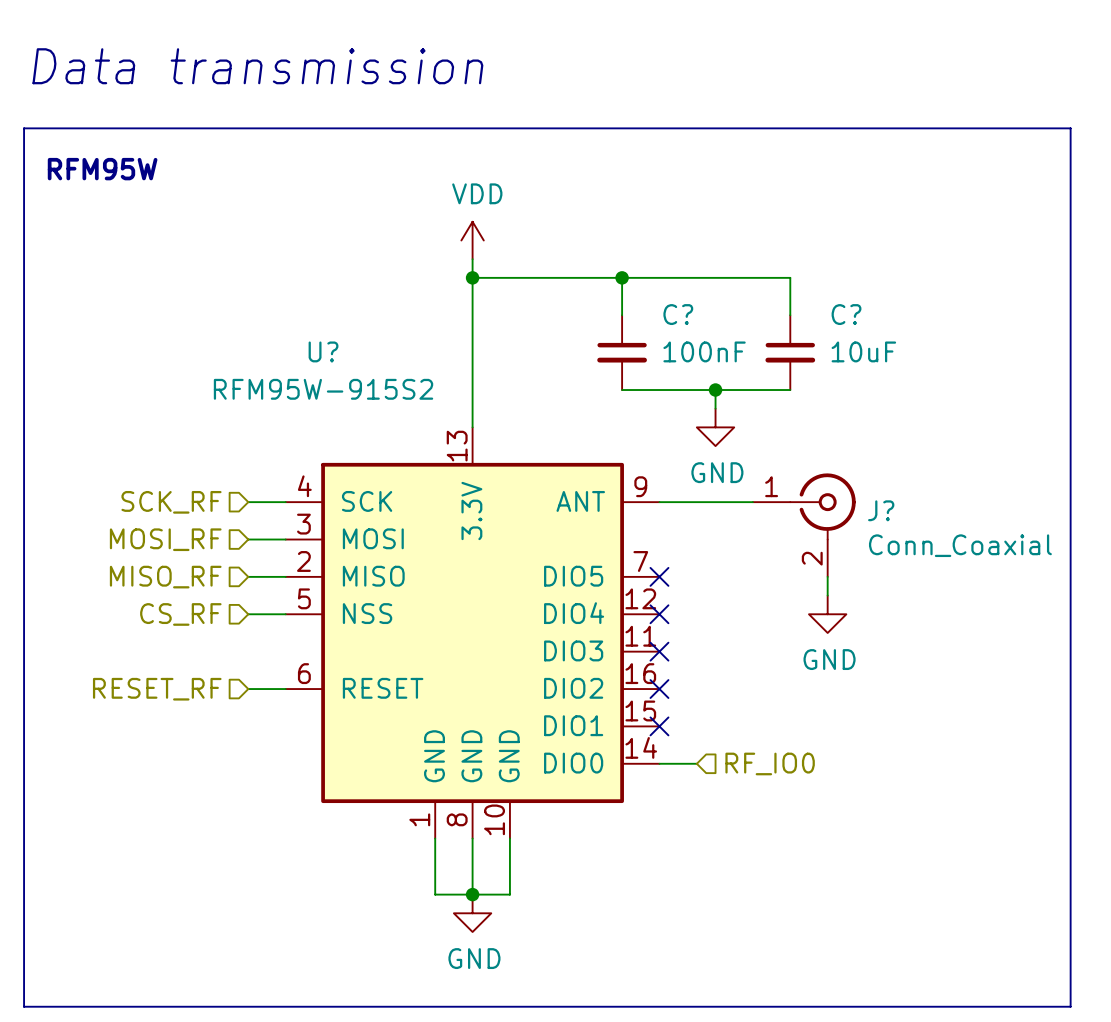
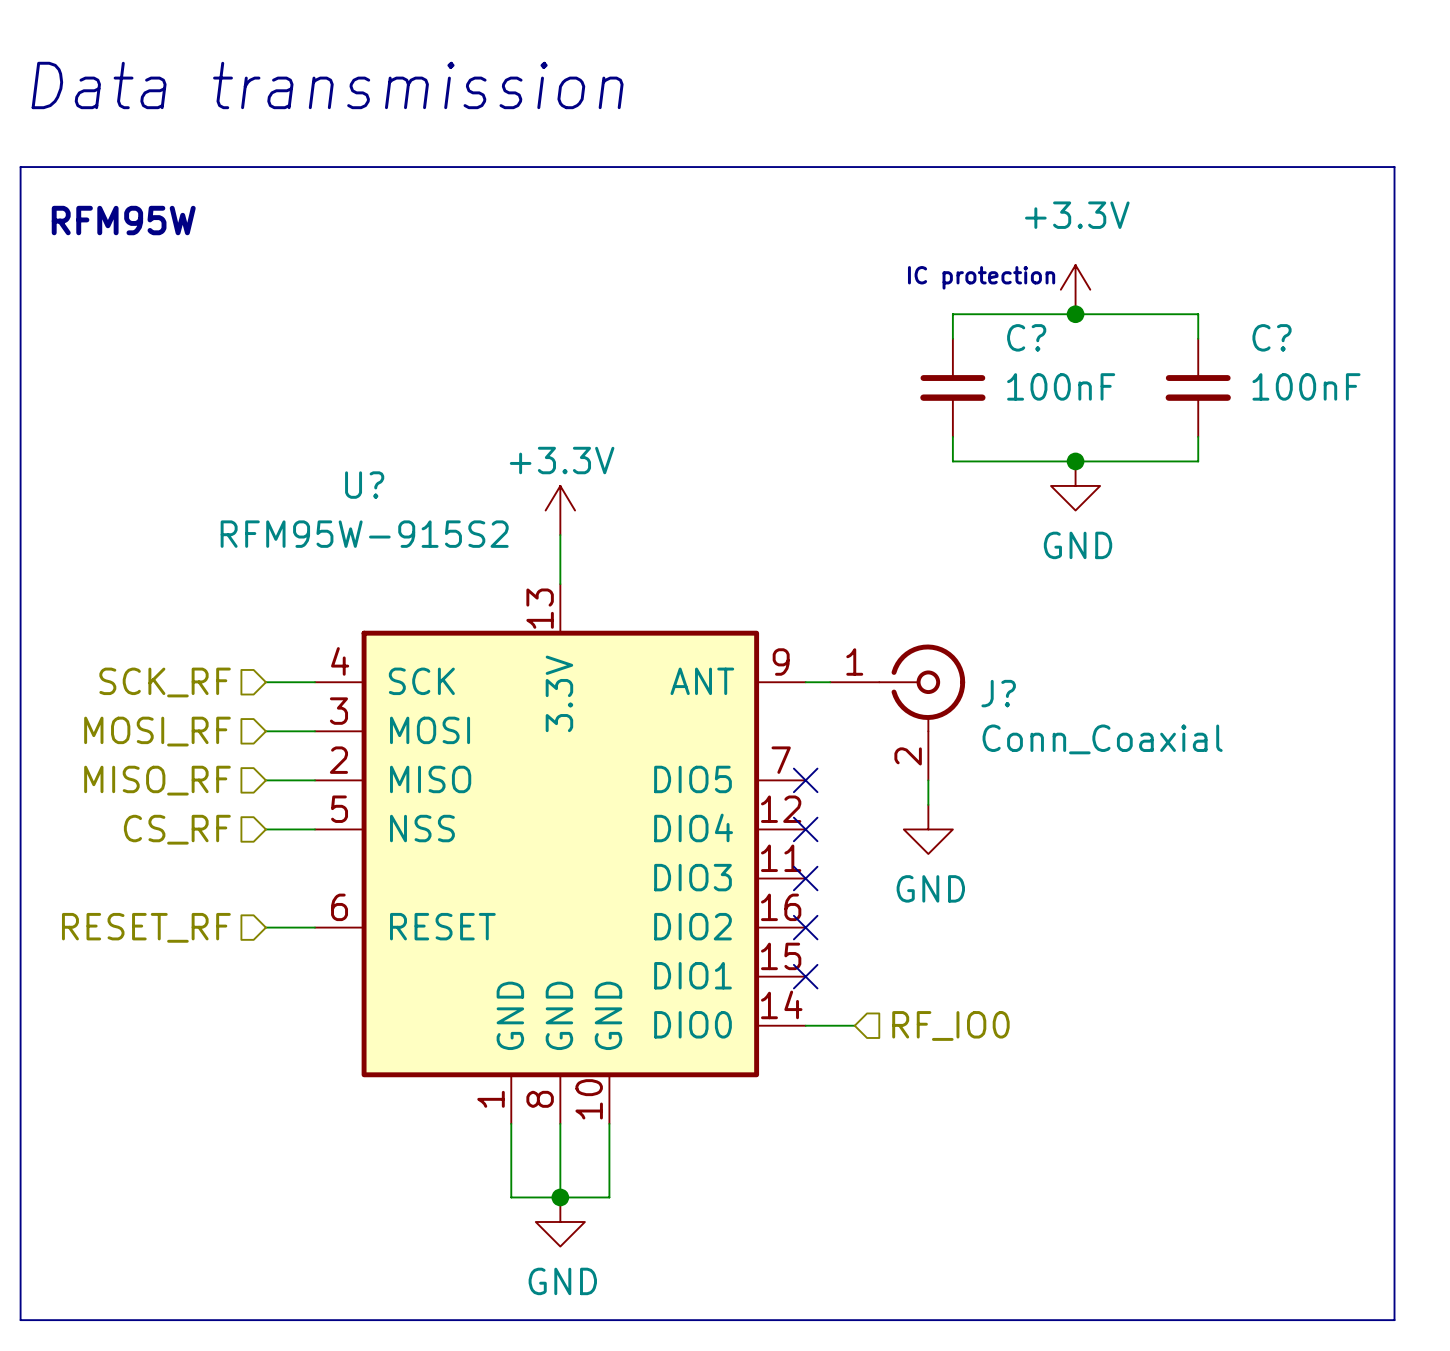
text: none -> IC protection (981, 277)
power symbol: none -> +3.3V (1075, 289)
power symbol: VDD (472, 240) -> none
junction: none -> (1075, 314)
wire: (472, 259) (472, 427) -> none
wire: none -> (952, 338) (952, 314) (1198, 314) (1198, 338)
wire: (472, 277) (790, 277) (790, 315) -> none
junction: (472, 277) -> none
wire: (622, 277) (622, 315) -> (560, 535) (560, 584)
junction: (622, 277) -> none
C?: none -> 100nF (1198, 387)
wire: none -> (952, 436) (952, 461) (1198, 461) (1198, 436)
C? position: (622, 352) -> (952, 387)
C?: 10uF (790, 352) -> none
junction: none -> (1075, 461)
power symbol: none -> GND (1075, 485)
power symbol: none -> +3.3V (560, 510)
wire: (622, 390) (790, 390) -> none
wire: (715, 390) (715, 408) -> none
junction: (715, 390) -> none
power symbol: GND (715, 427) -> none
hierarchical label position: SCK_RF (171, 502) -> SCK_RF (165, 682)
wire: (248, 502) (285, 502) -> (265, 682) (315, 682)
wire: (659, 502) (752, 502) -> none
wire: none -> (805, 682) (830, 682)
J? position: (804, 525) -> (897, 712)
hierarchical label position: MOSI_RF (165, 539) -> MOSI_RF (157, 731)
wire: (248, 539) (285, 539) -> (265, 731) (315, 731)
wire: (248, 576) (285, 576) -> (265, 780) (315, 780)
no-connect mark: (659, 576) -> none
wire: (827, 576) (827, 595) -> (928, 780) (928, 804)
hierarchical label position: MISO_RF (165, 577) -> MISO_RF (157, 780)
no-connect mark: none -> (805, 780)
hierarchical label position: CS_RF (180, 614) -> CS_RF (177, 829)
wire: (248, 614) (285, 614) -> (265, 829) (315, 829)
no-connect mark: (659, 614) -> none
power symbol: GND (827, 614) -> none
U? position: (472, 632) -> (560, 853)
no-connect mark: none -> (805, 829)
power symbol: none -> GND (928, 829)
no-connect mark: (659, 651) -> none
no-connect mark: none -> (805, 878)
hierarchical label position: RESET_RF (157, 689) -> RESET_RF (146, 927)
wire: (248, 689) (285, 689) -> (265, 927) (315, 927)
no-connect mark: (659, 689) -> none
no-connect mark: none -> (805, 927)
no-connect mark: (659, 726) -> none
no-connect mark: none -> (805, 976)
wire: (659, 763) (696, 763) -> (805, 1025) (854, 1025)
hierarchical label position: RF_IO0 (770, 763) -> RF_IO0 (950, 1025)
wire: (509, 838) (509, 894) (435, 894) -> (560, 1197) (560, 1172)
wire: none -> (511, 1123) (511, 1197) (609, 1197) (609, 1172)
junction position: (472, 894) -> (560, 1197)
power symbol position: GND (472, 913) -> GND (560, 1222)

